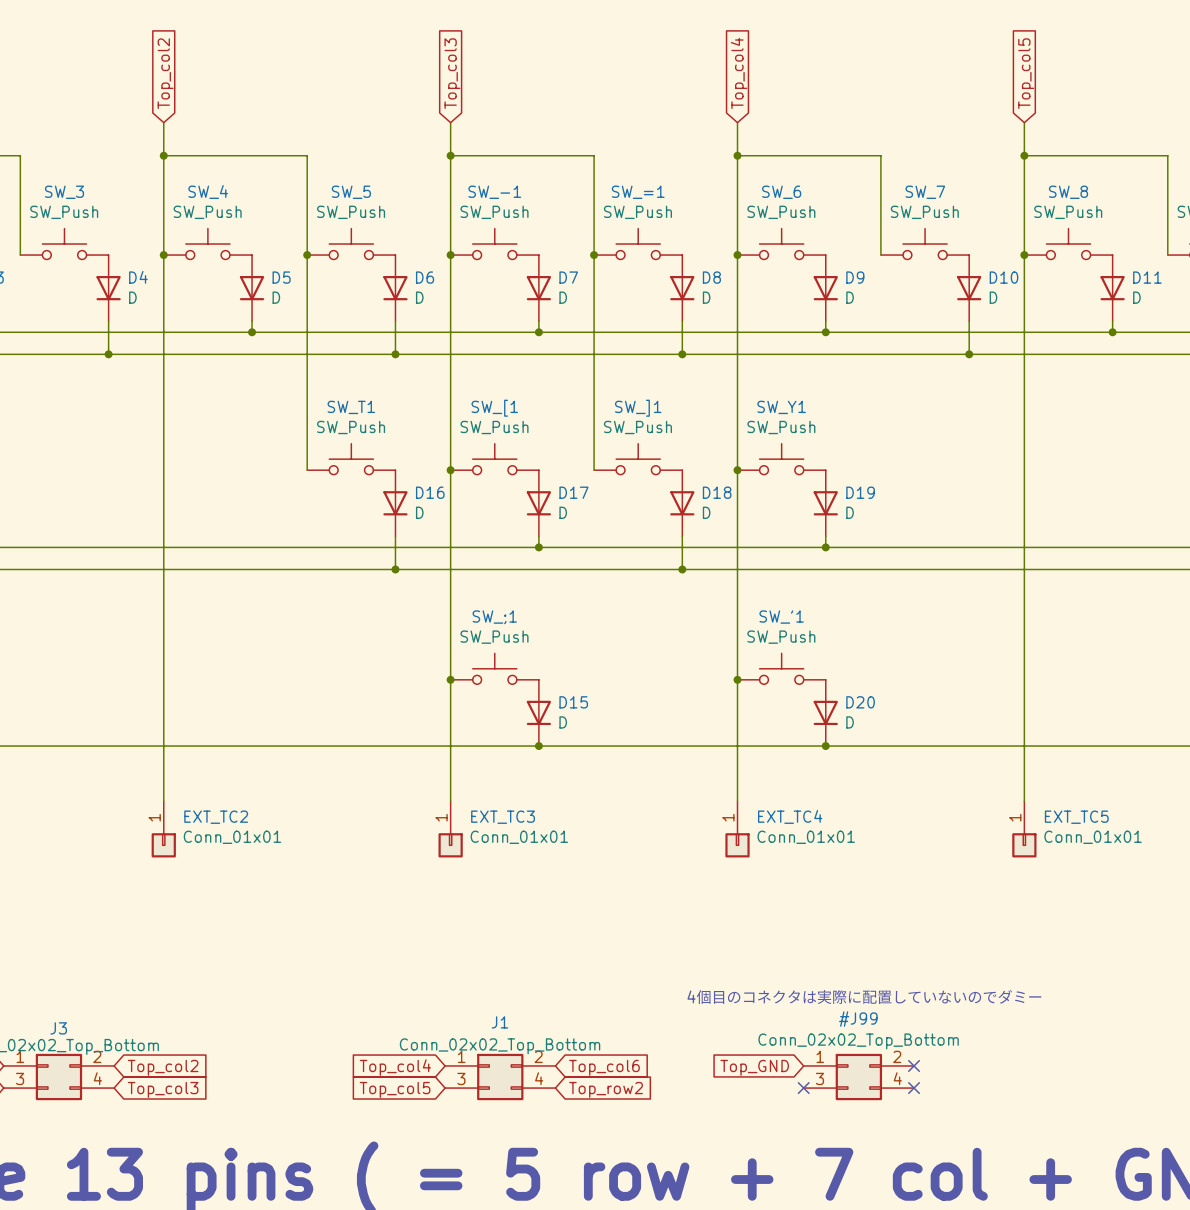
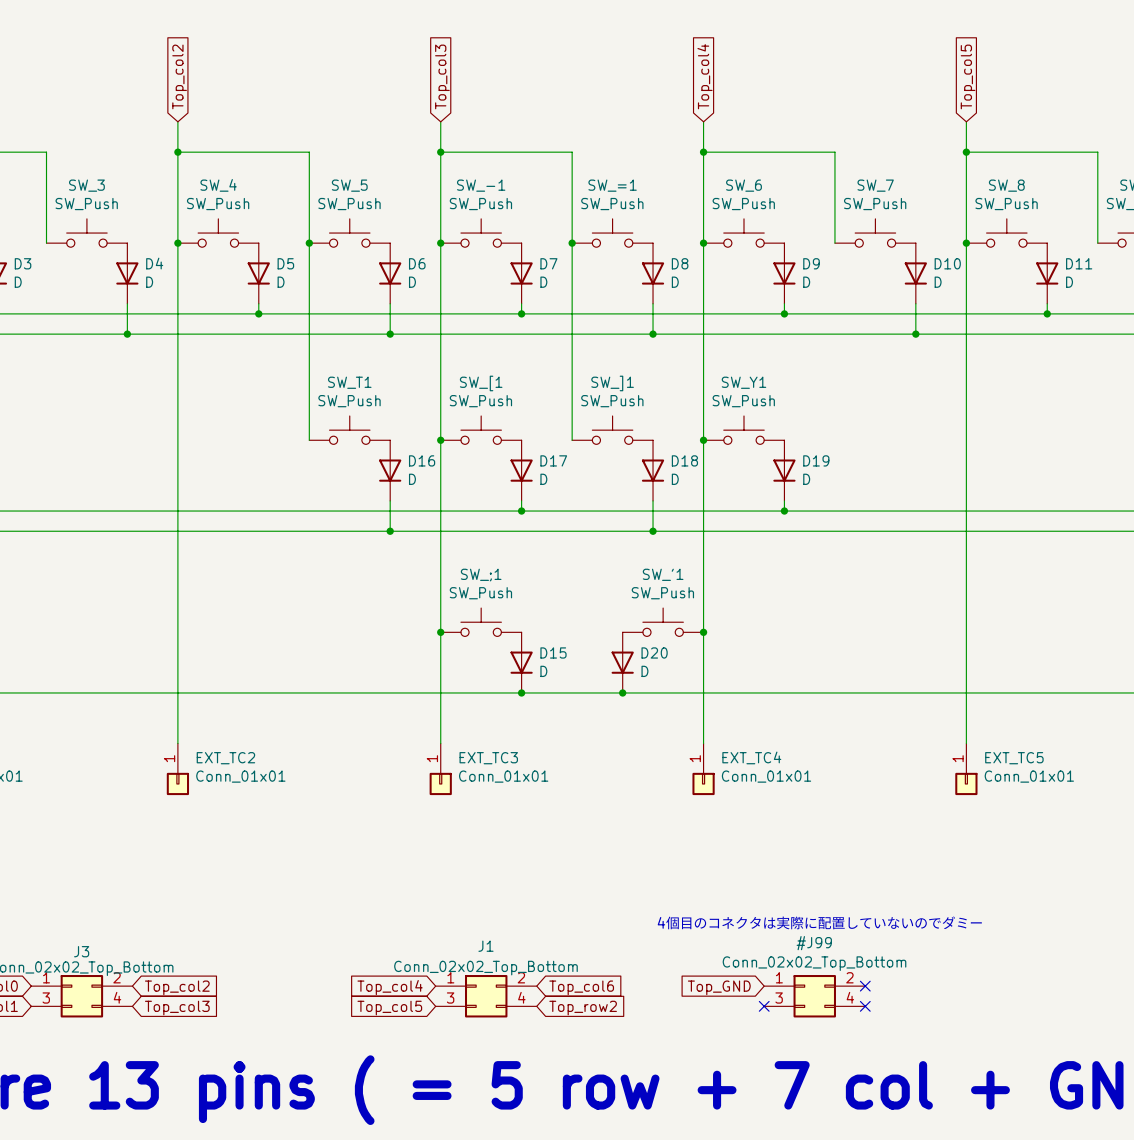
SW_'1 position: (781, 668) -> (663, 622)
D20 position: (825, 712) -> (622, 662)
junction: none -> (622, 692)
junction: (825, 746) -> none

